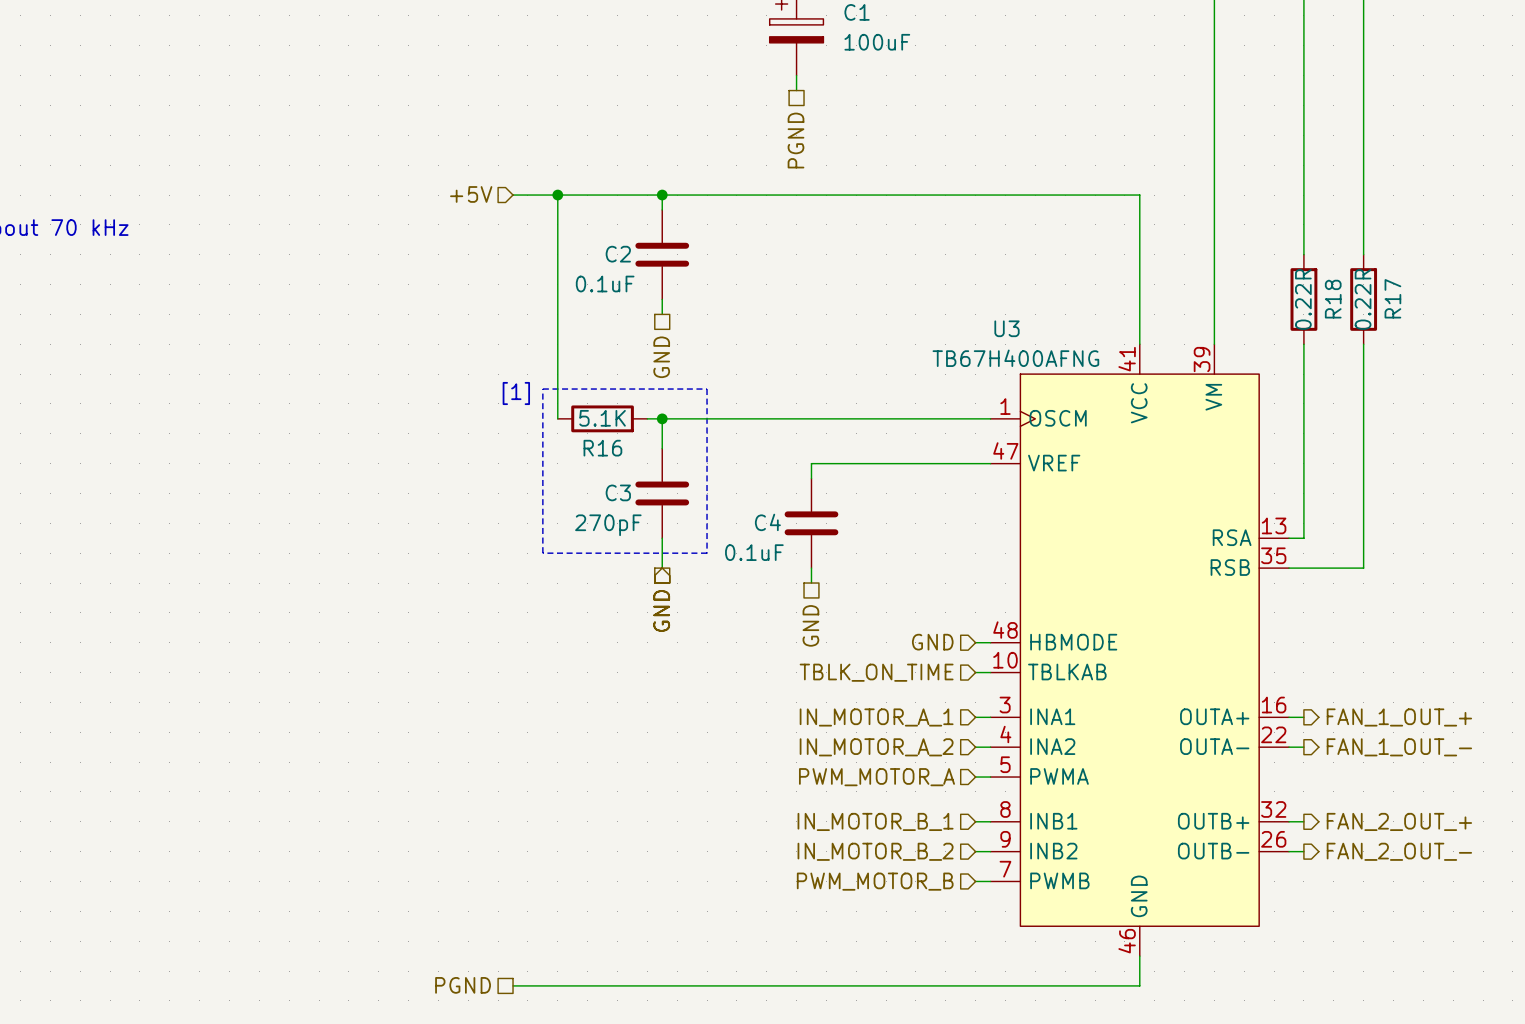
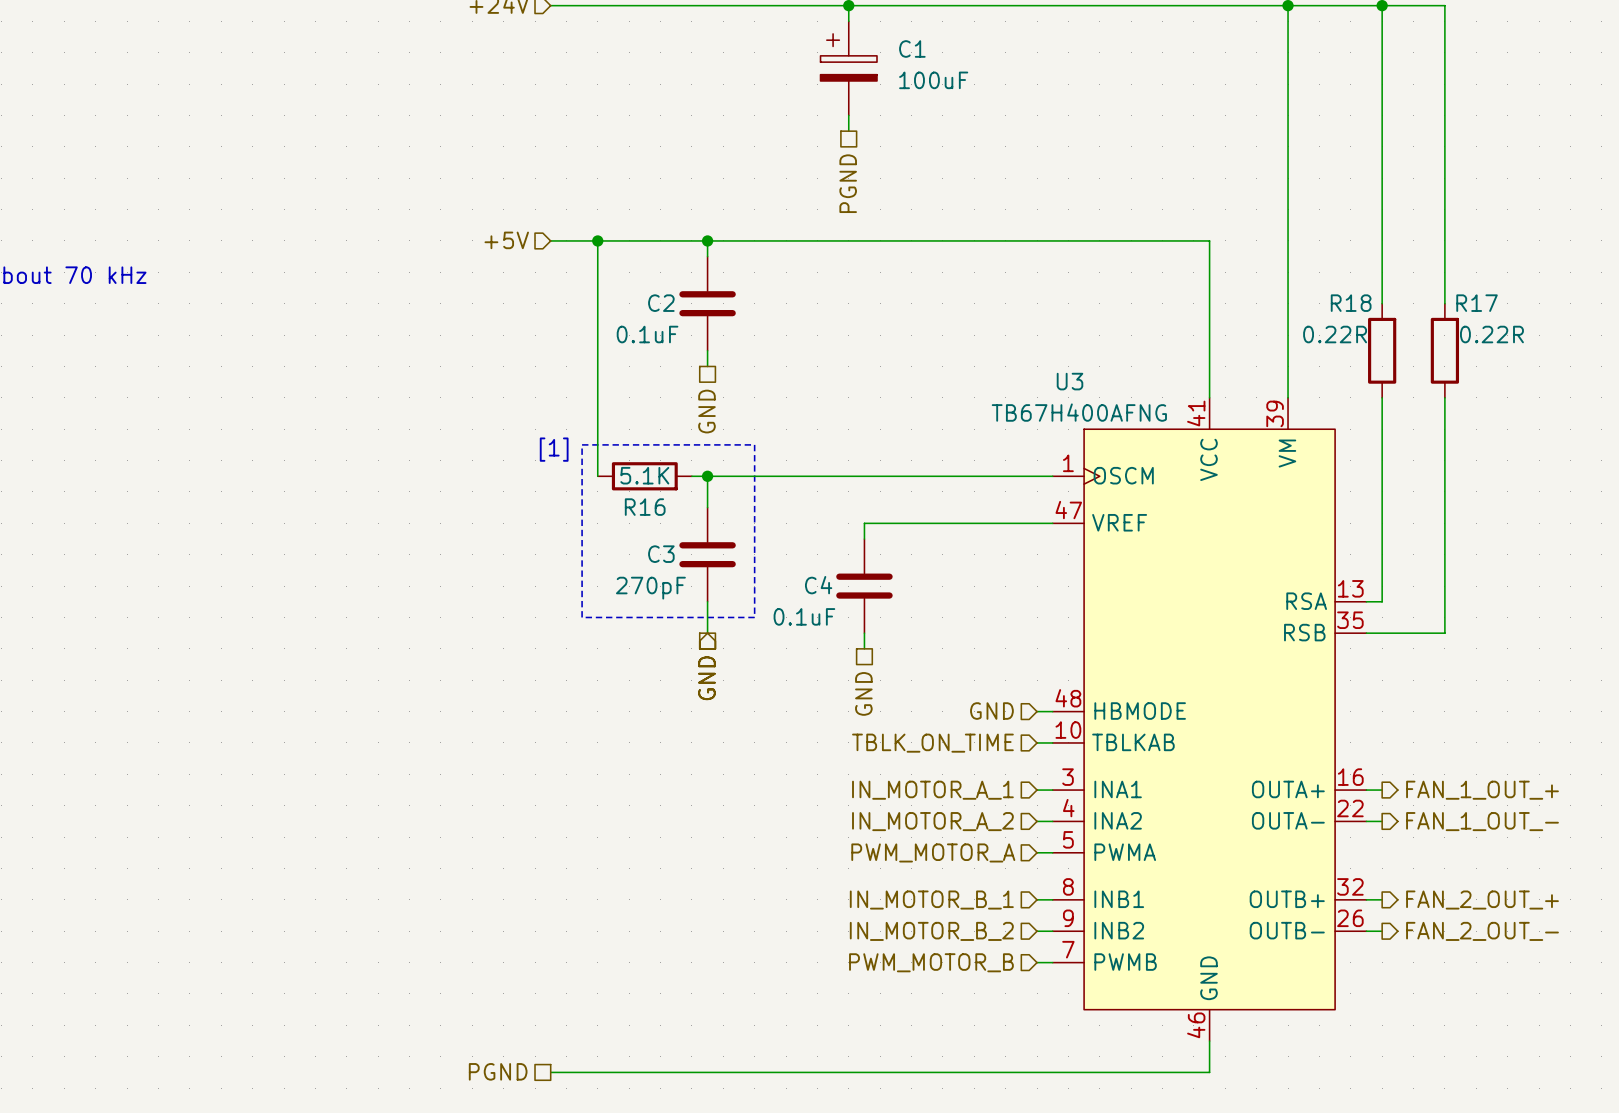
R17 name rotation: 0° (1392, 298) -> 90° clockwise (1477, 303)
R18 value rotation: 0° (1303, 299) -> 90° clockwise (1491, 334)
R18 value position: 0.22R (1303, 299) -> 0.22R (1491, 334)
R18 name rotation: 0° (1333, 299) -> 90° clockwise (1351, 303)
R18 name position: R18 (1333, 299) -> R18 (1351, 303)
R17 value rotation: 0° (1363, 299) -> 90° clockwise (1335, 334)
R17 value position: 0.22R (1363, 299) -> 0.22R (1335, 334)

